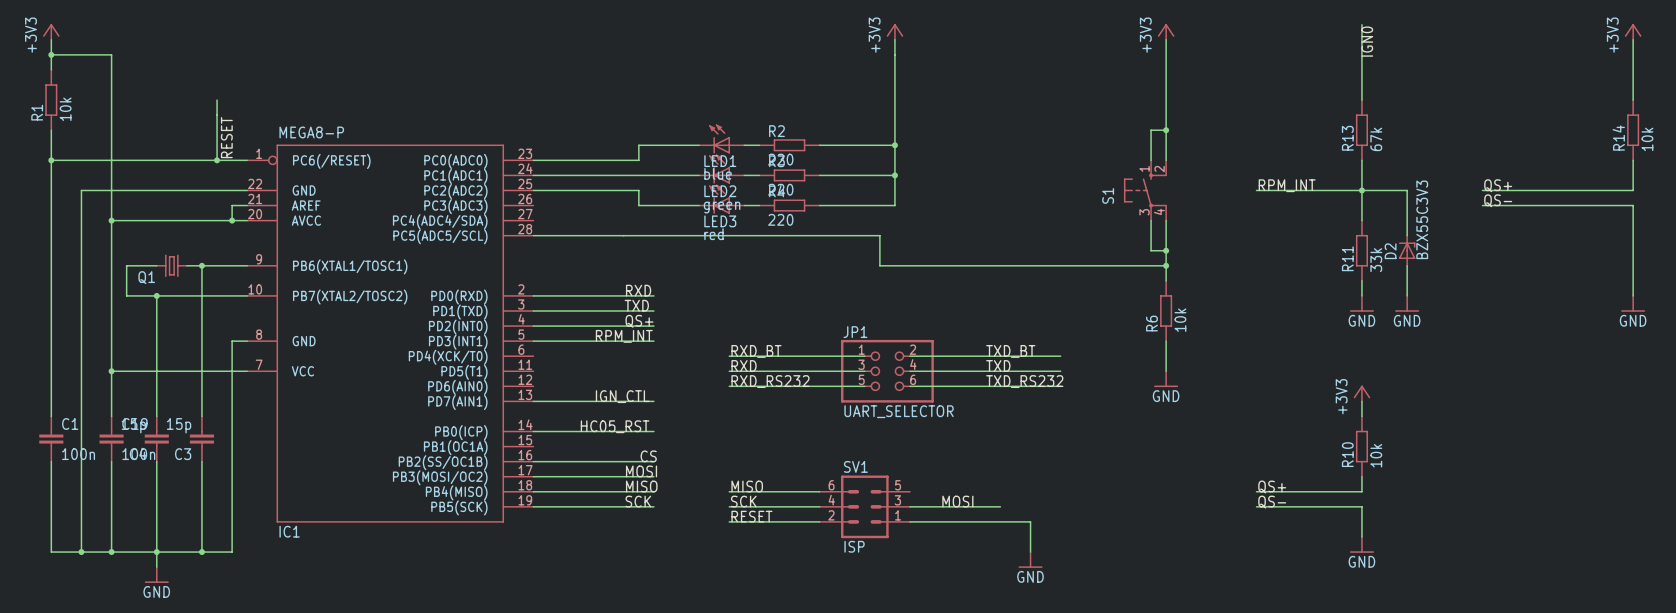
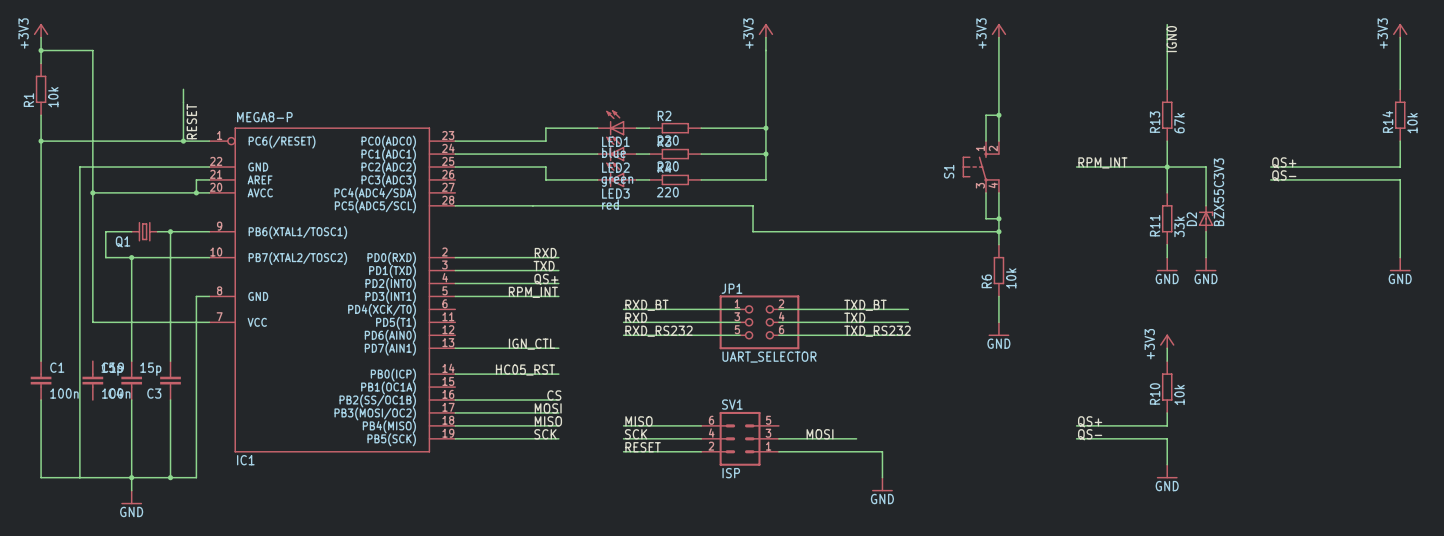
wire: (96, 190) (81, 190) (81, 552) -> (79, 167) (79, 477)
wire: (111, 371) (111, 416) -> none
junction: (111, 371) -> none
wire: (111, 461) (111, 552) -> none
junction: (81, 552) -> none
junction: (111, 552) -> none

